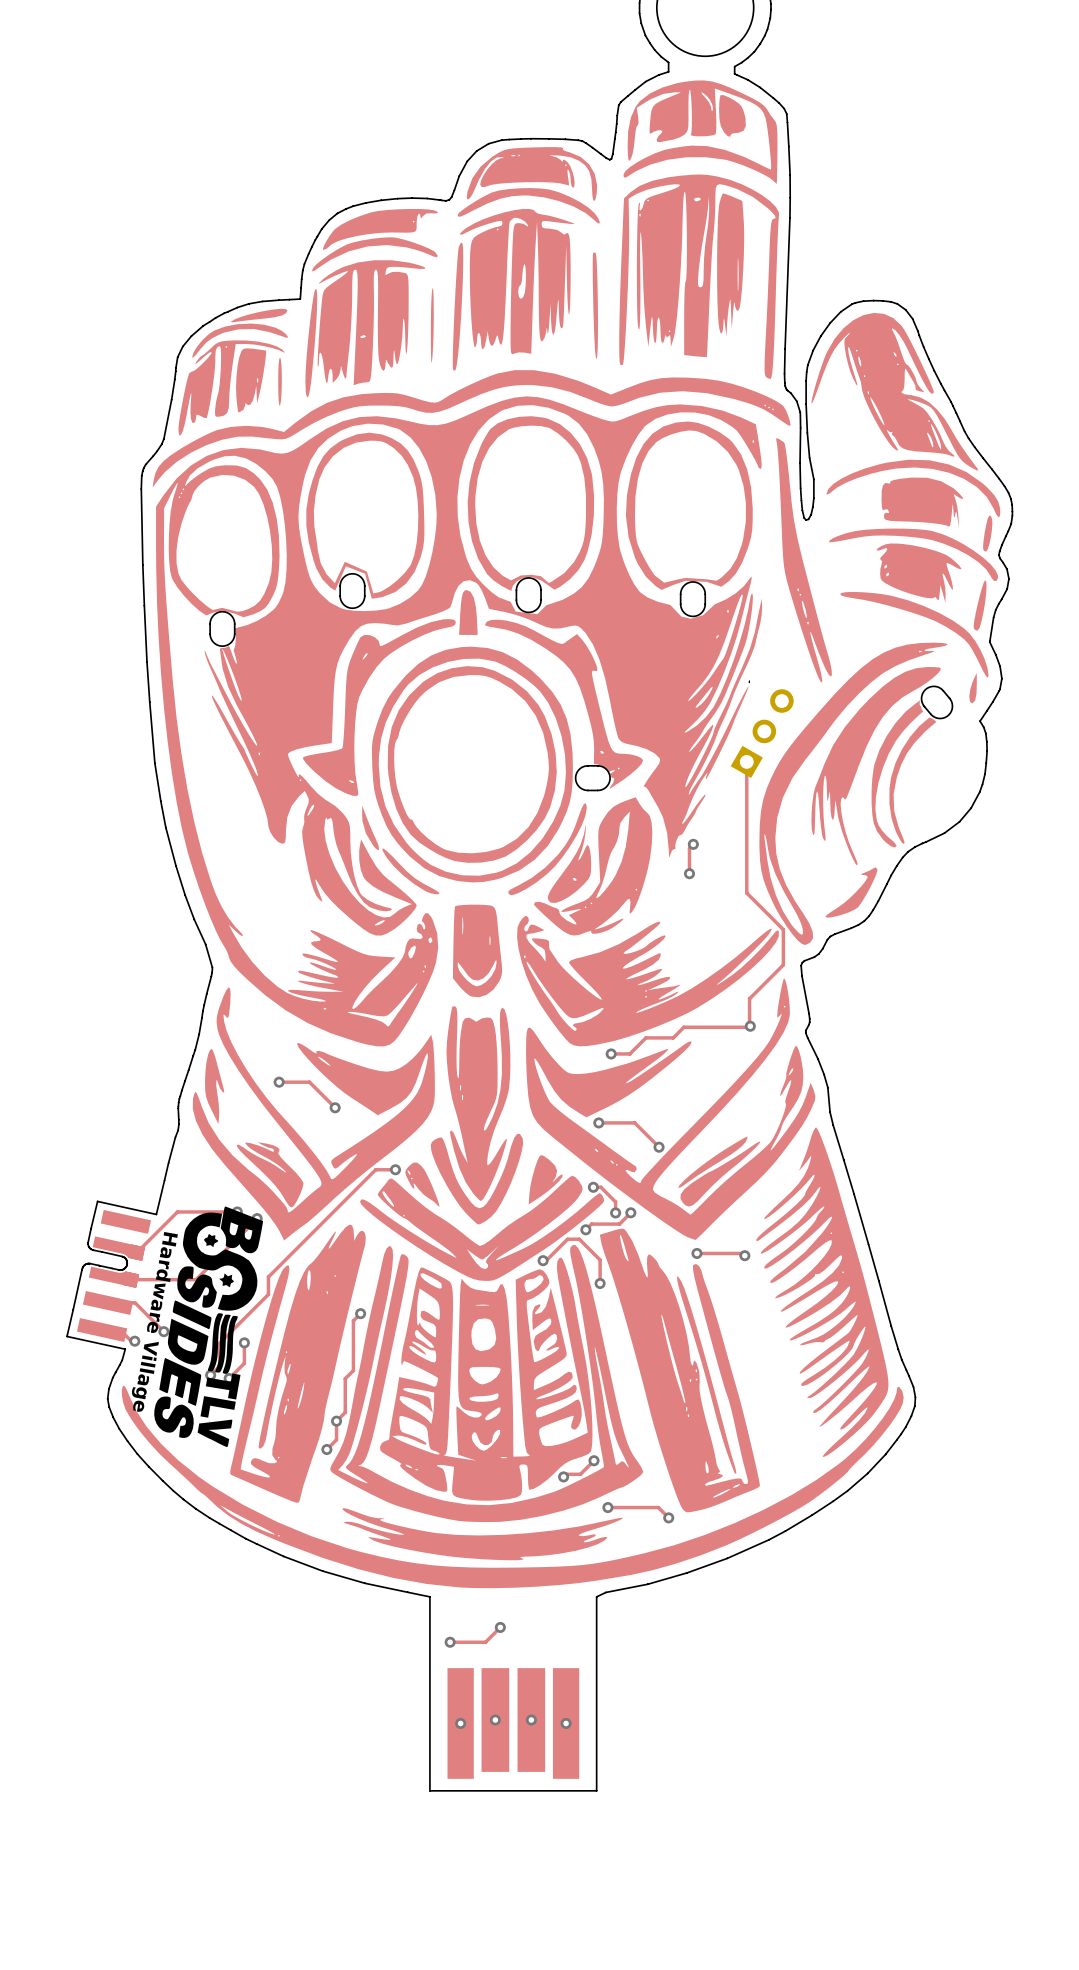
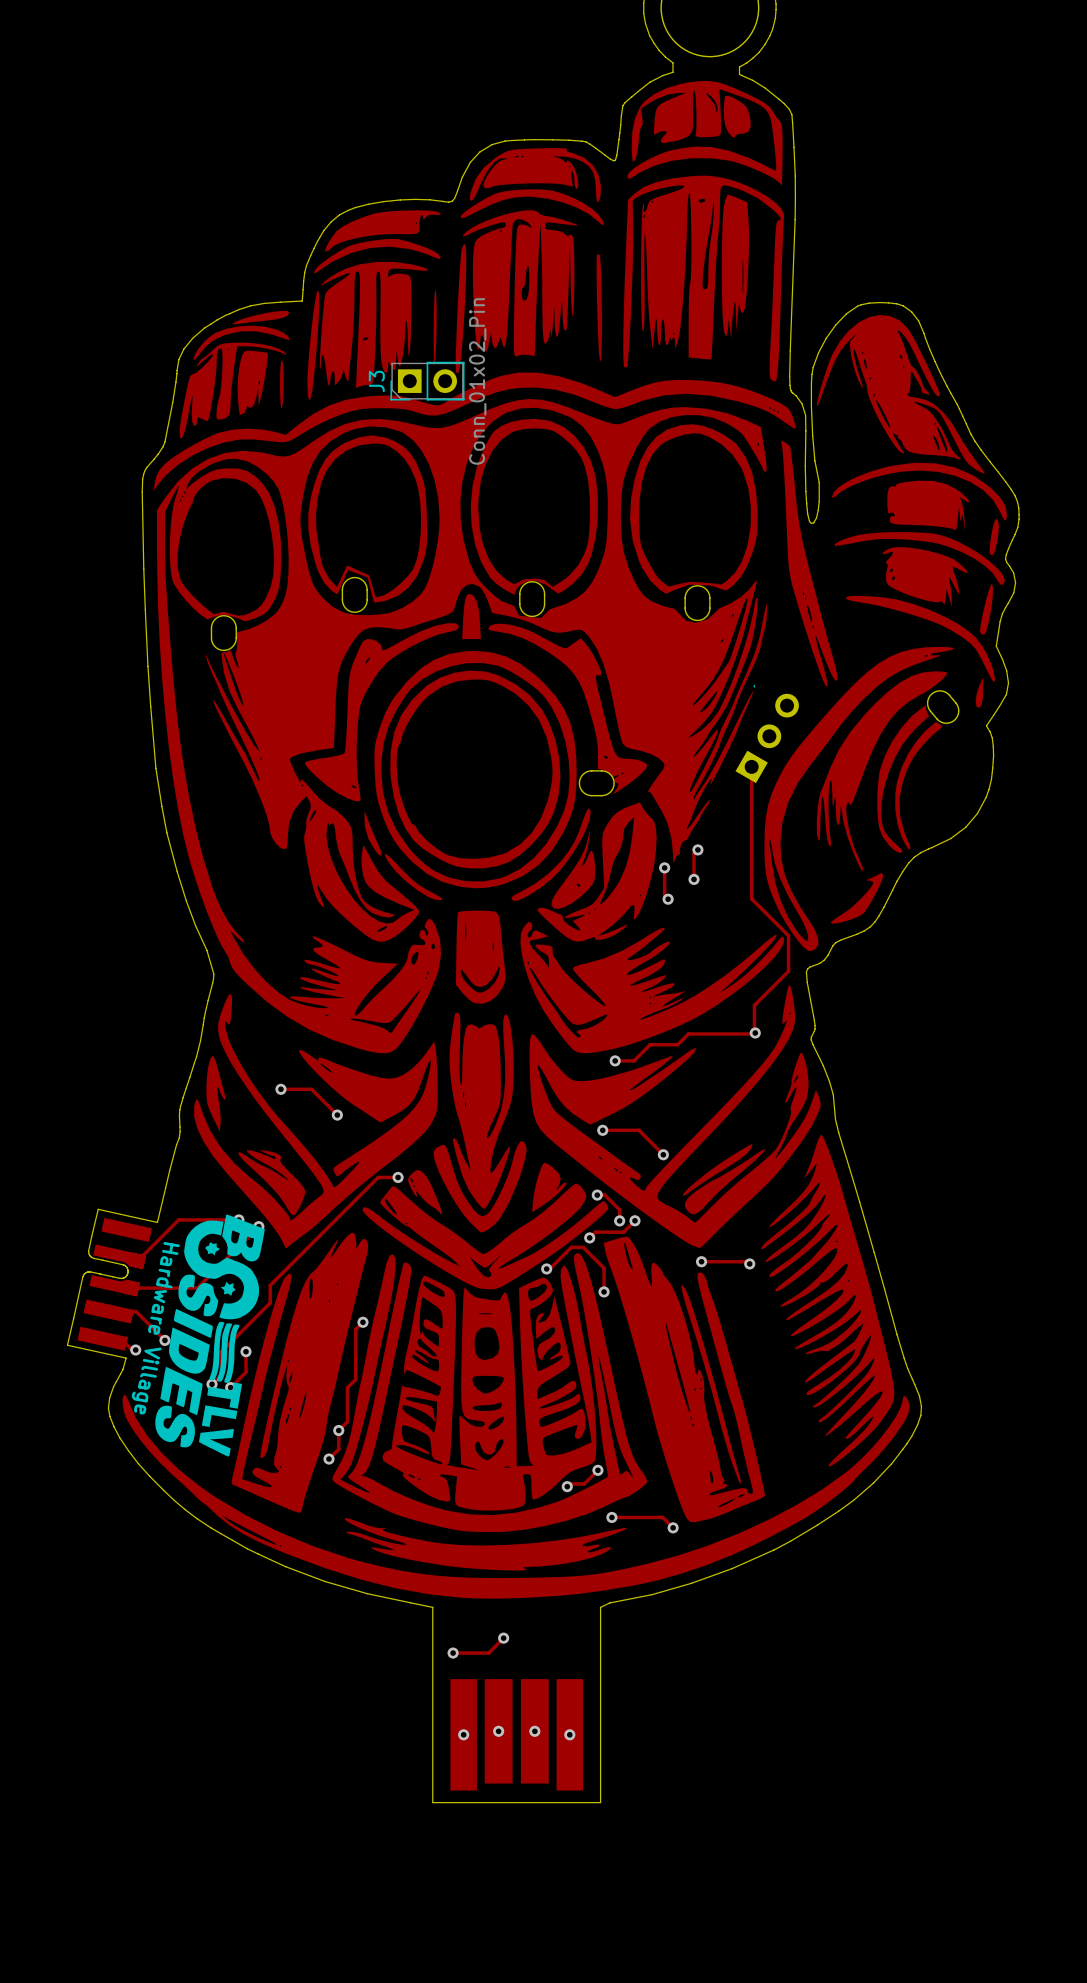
J3: none -> Conn_01x02_Pin (427, 381)
track: none -> (664, 867) (664, 895) (668, 899)
via: none -> (664, 867)
via: none -> (668, 899)

